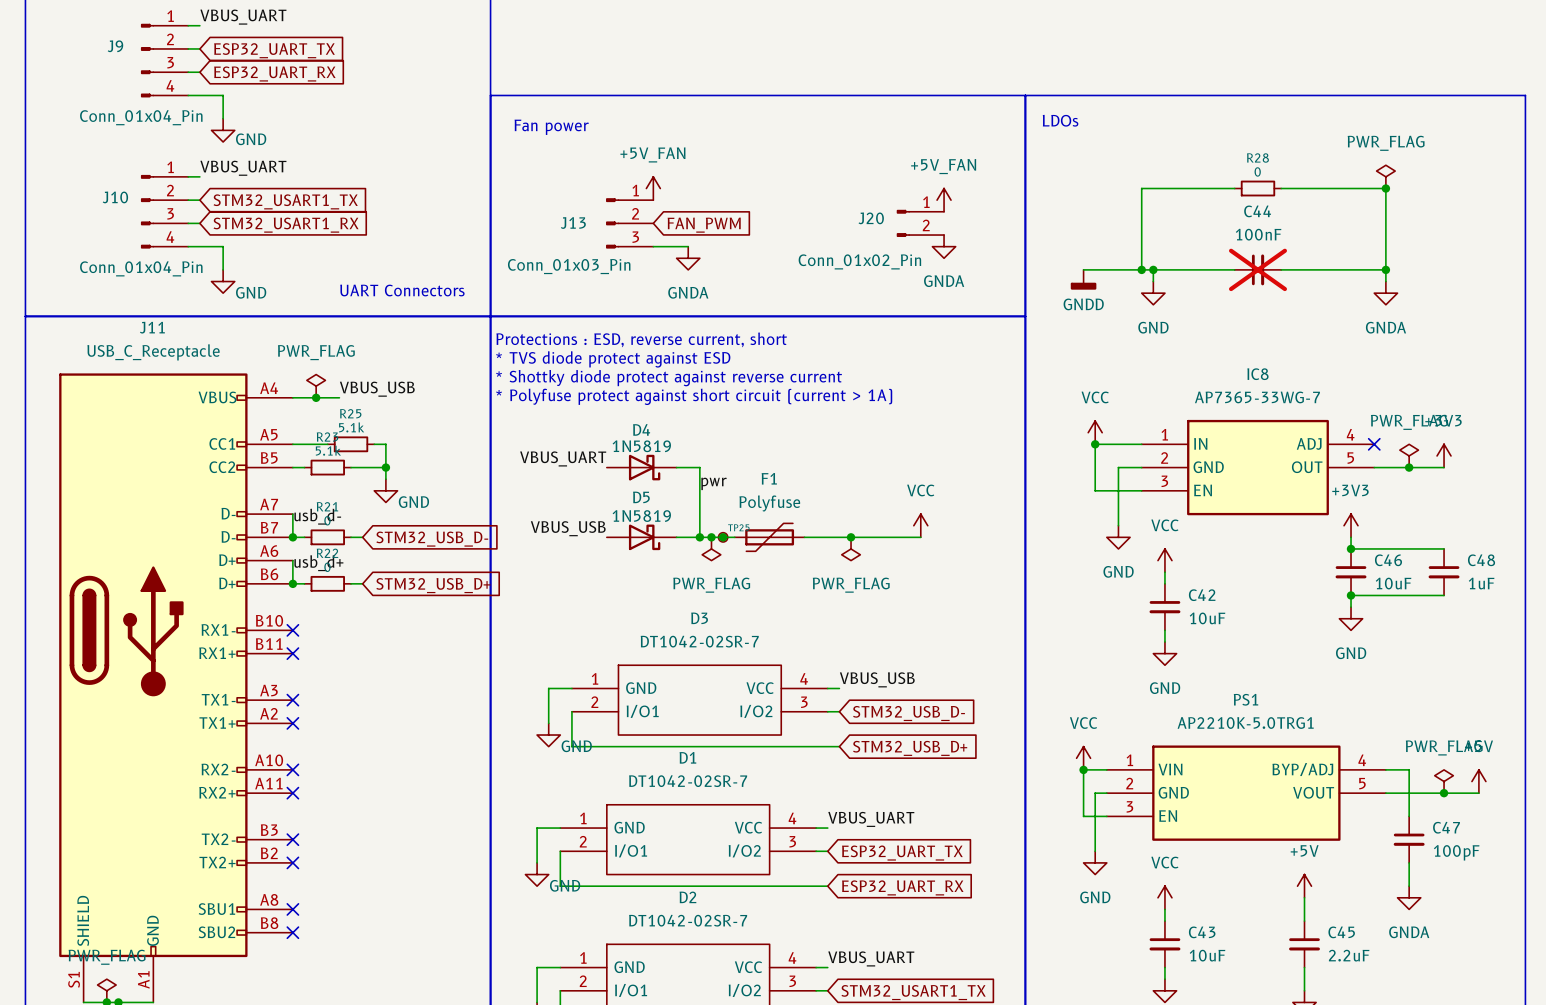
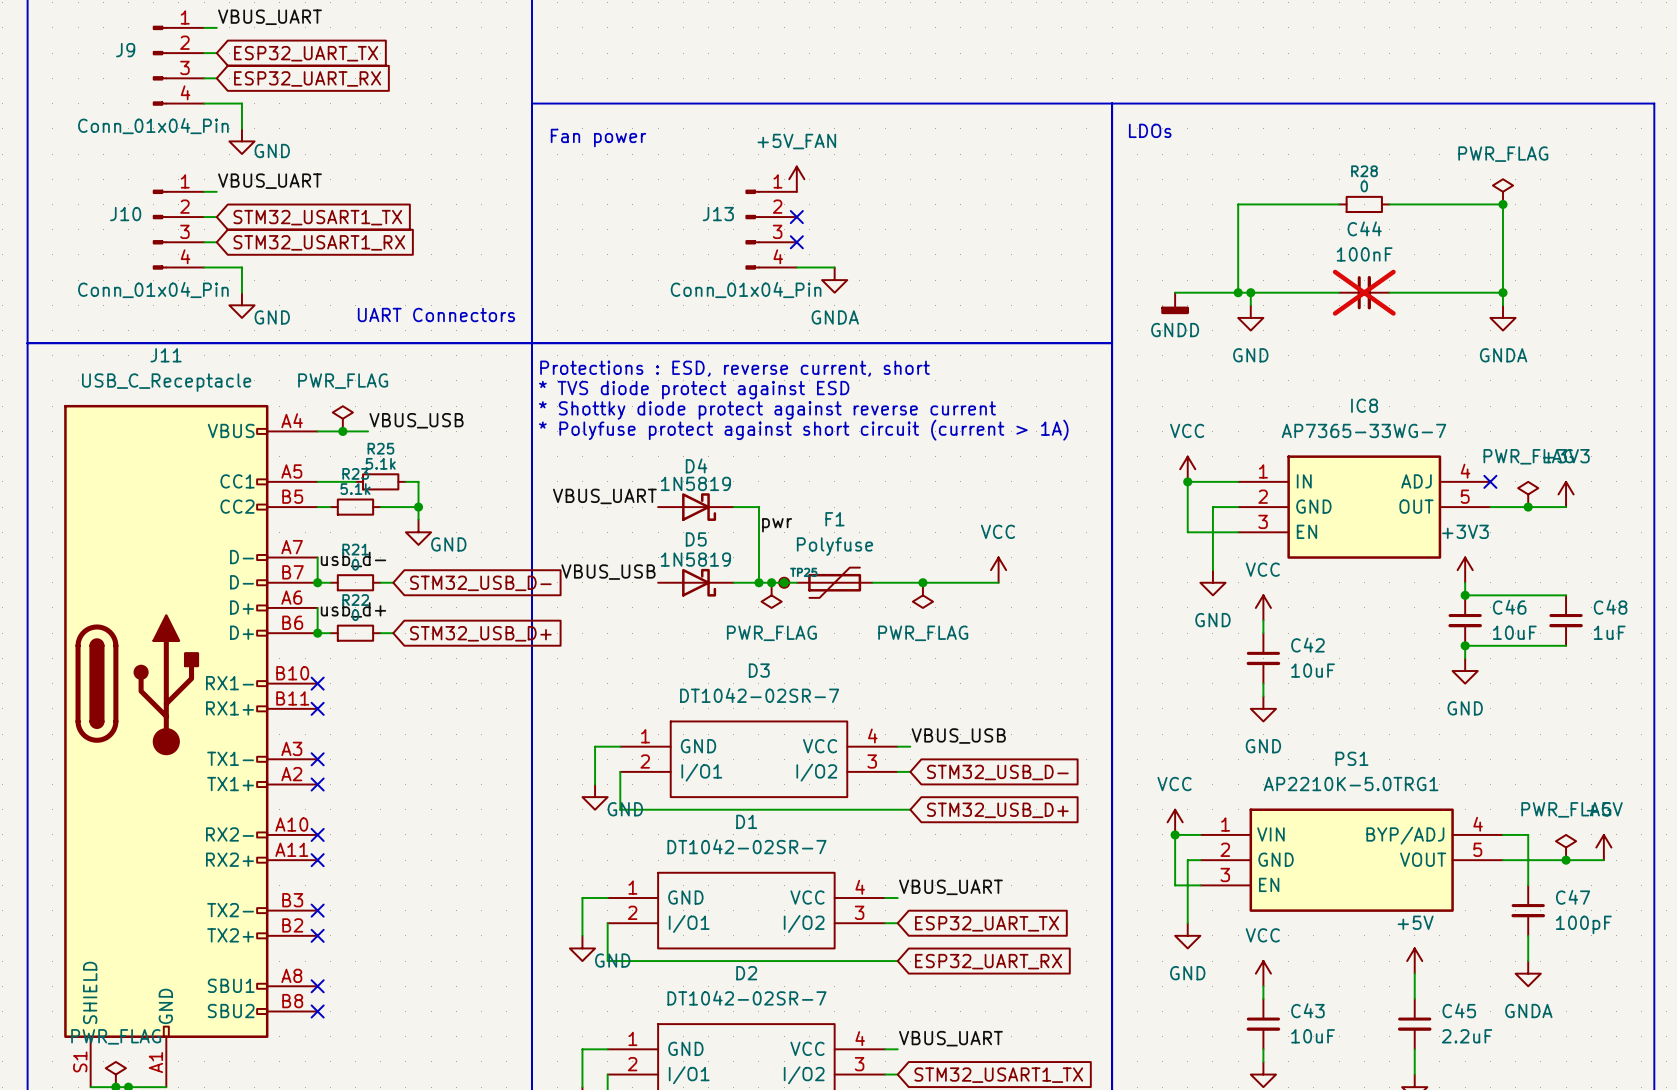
power symbol position: +5V_FAN (653, 188) -> +5V_FAN (796, 179)
J13 symbol: [606, 198, 654, 249] -> [745, 189, 797, 270]
no-connect mark: none -> (796, 217)
power symbol: +5V_FAN (944, 200) -> none
no-connect mark: none -> (796, 242)
J20: Conn_01x02_Pin (920, 223) -> none
global label: FAN_PWM (704, 225) -> none
wire: (653, 246) (688, 246) -> (796, 267) (834, 267)
power symbol: GNDA (944, 246) -> none
power symbol position: GNDA (688, 258) -> GNDA (834, 280)
J13 value: Conn_01x03_Pin (569, 266) -> Conn_01x04_Pin (746, 290)

